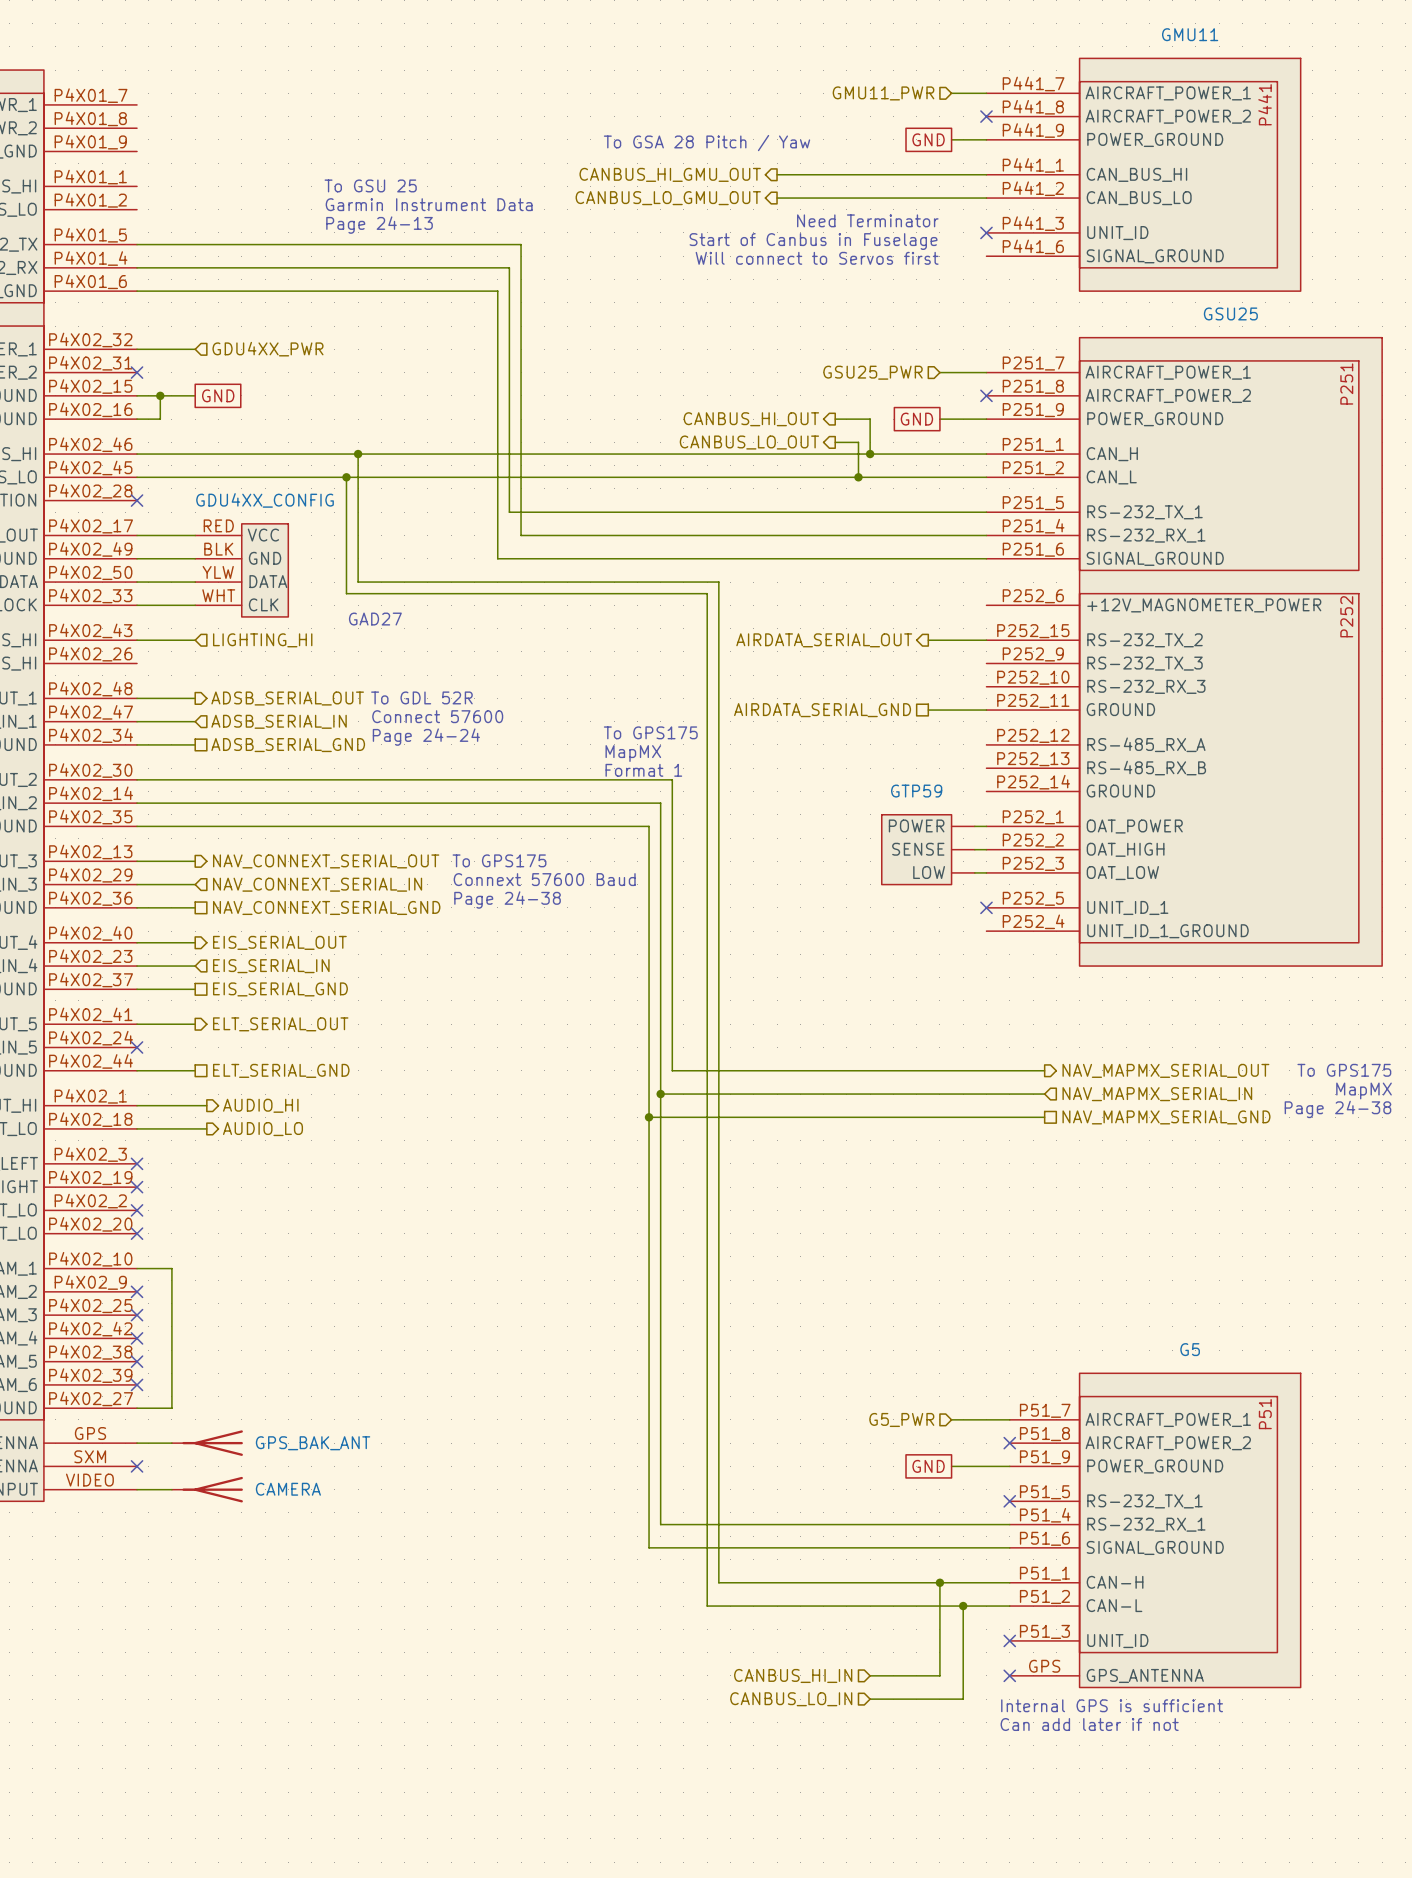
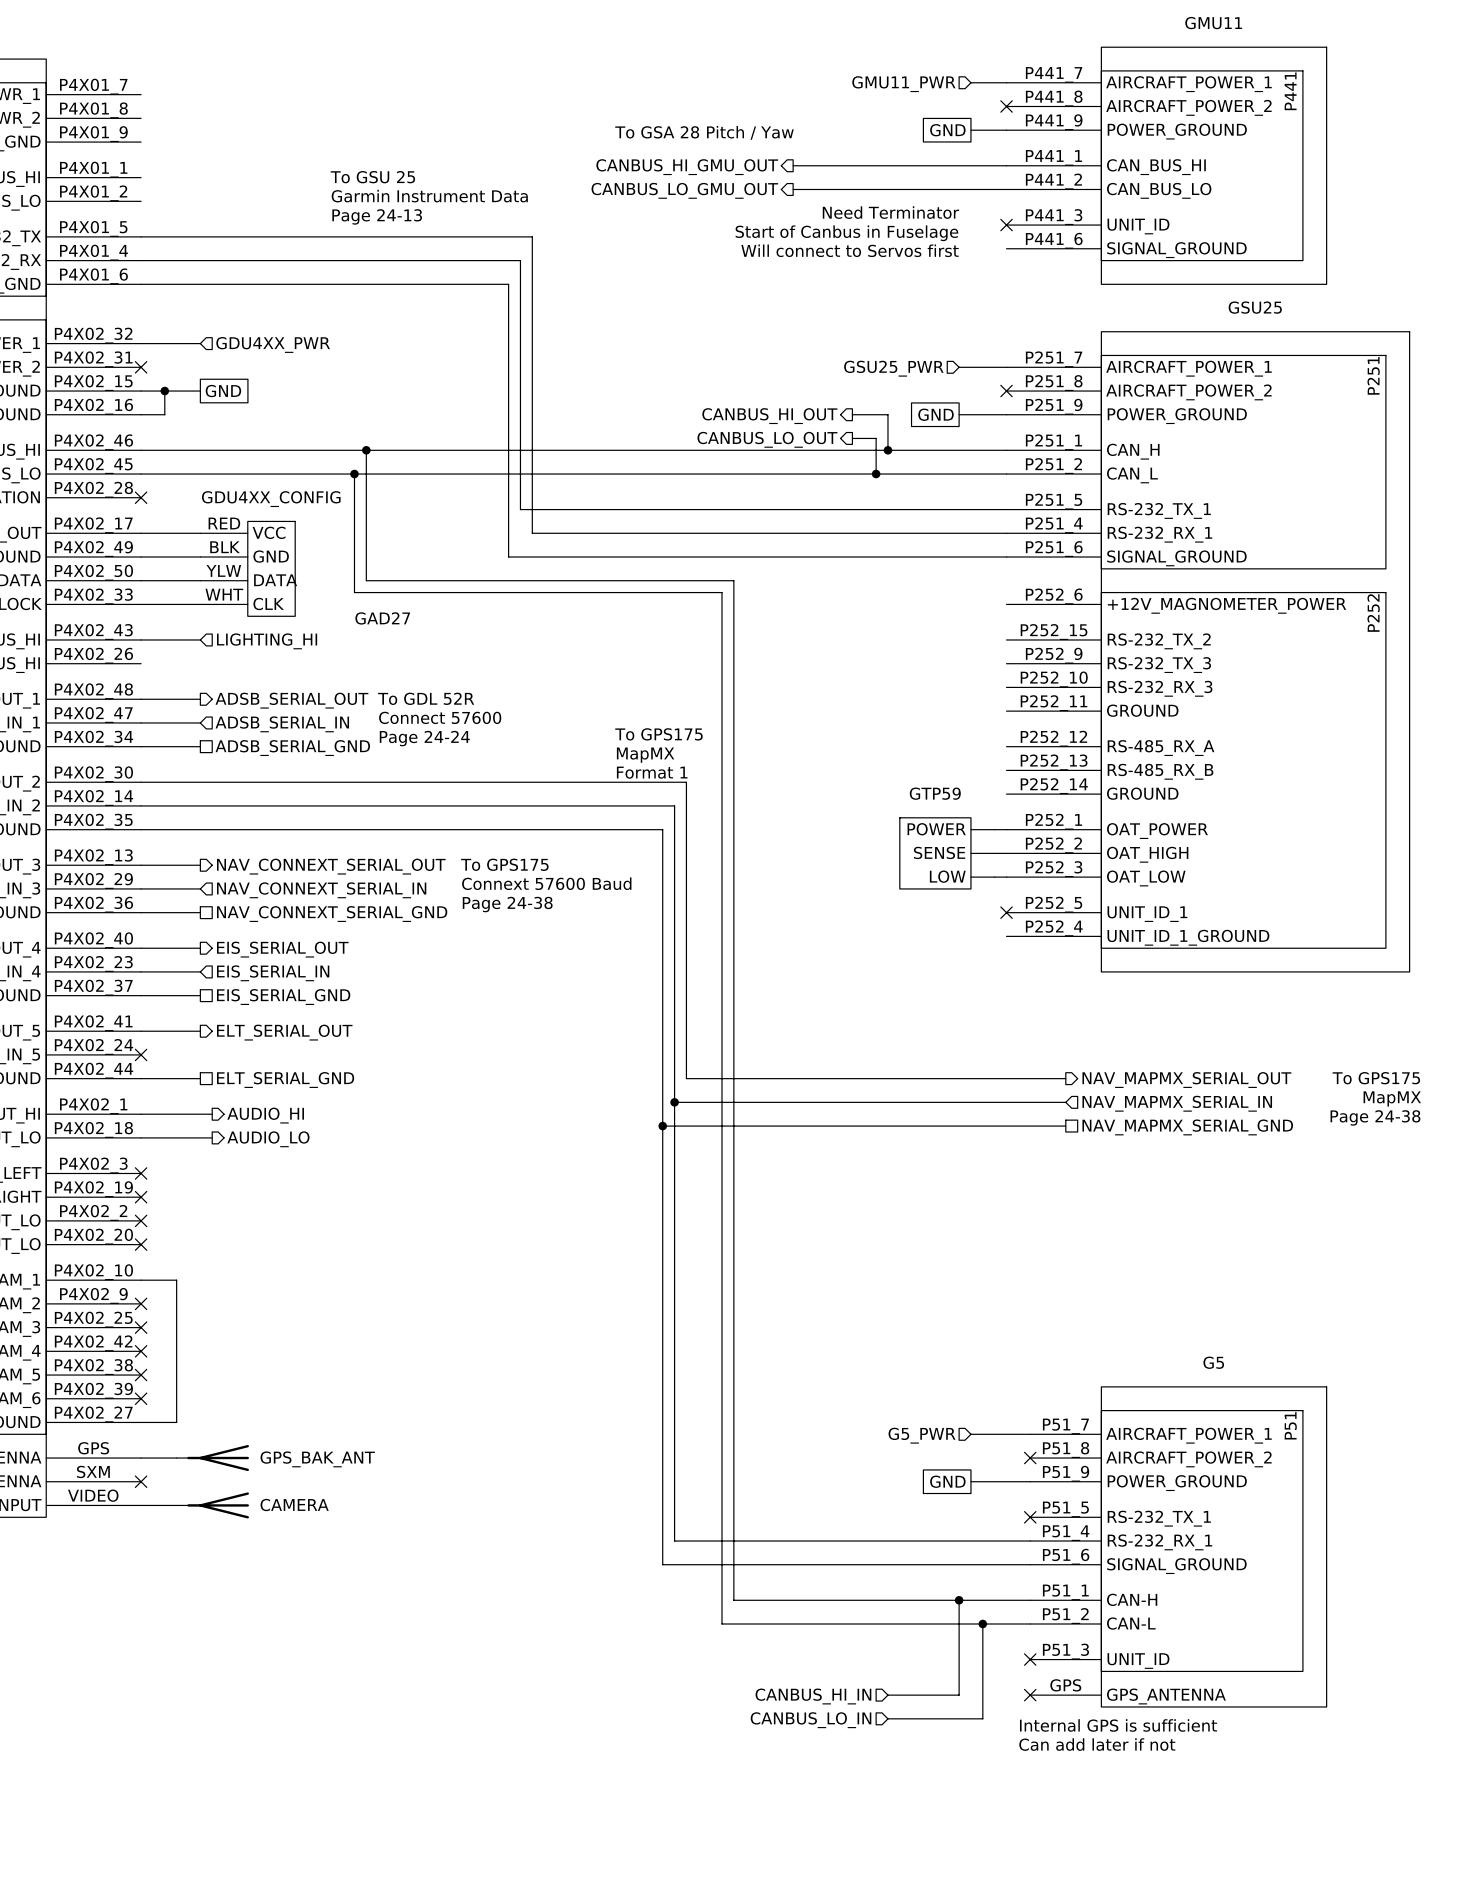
hierarchical label: AIRDATA_SERIAL_OUT (824, 640) -> none
wire: (928, 640) (986, 640) -> none
hierarchical label: AIRDATA_SERIAL_GND (822, 710) -> none
wire: (928, 710) (986, 710) -> none

